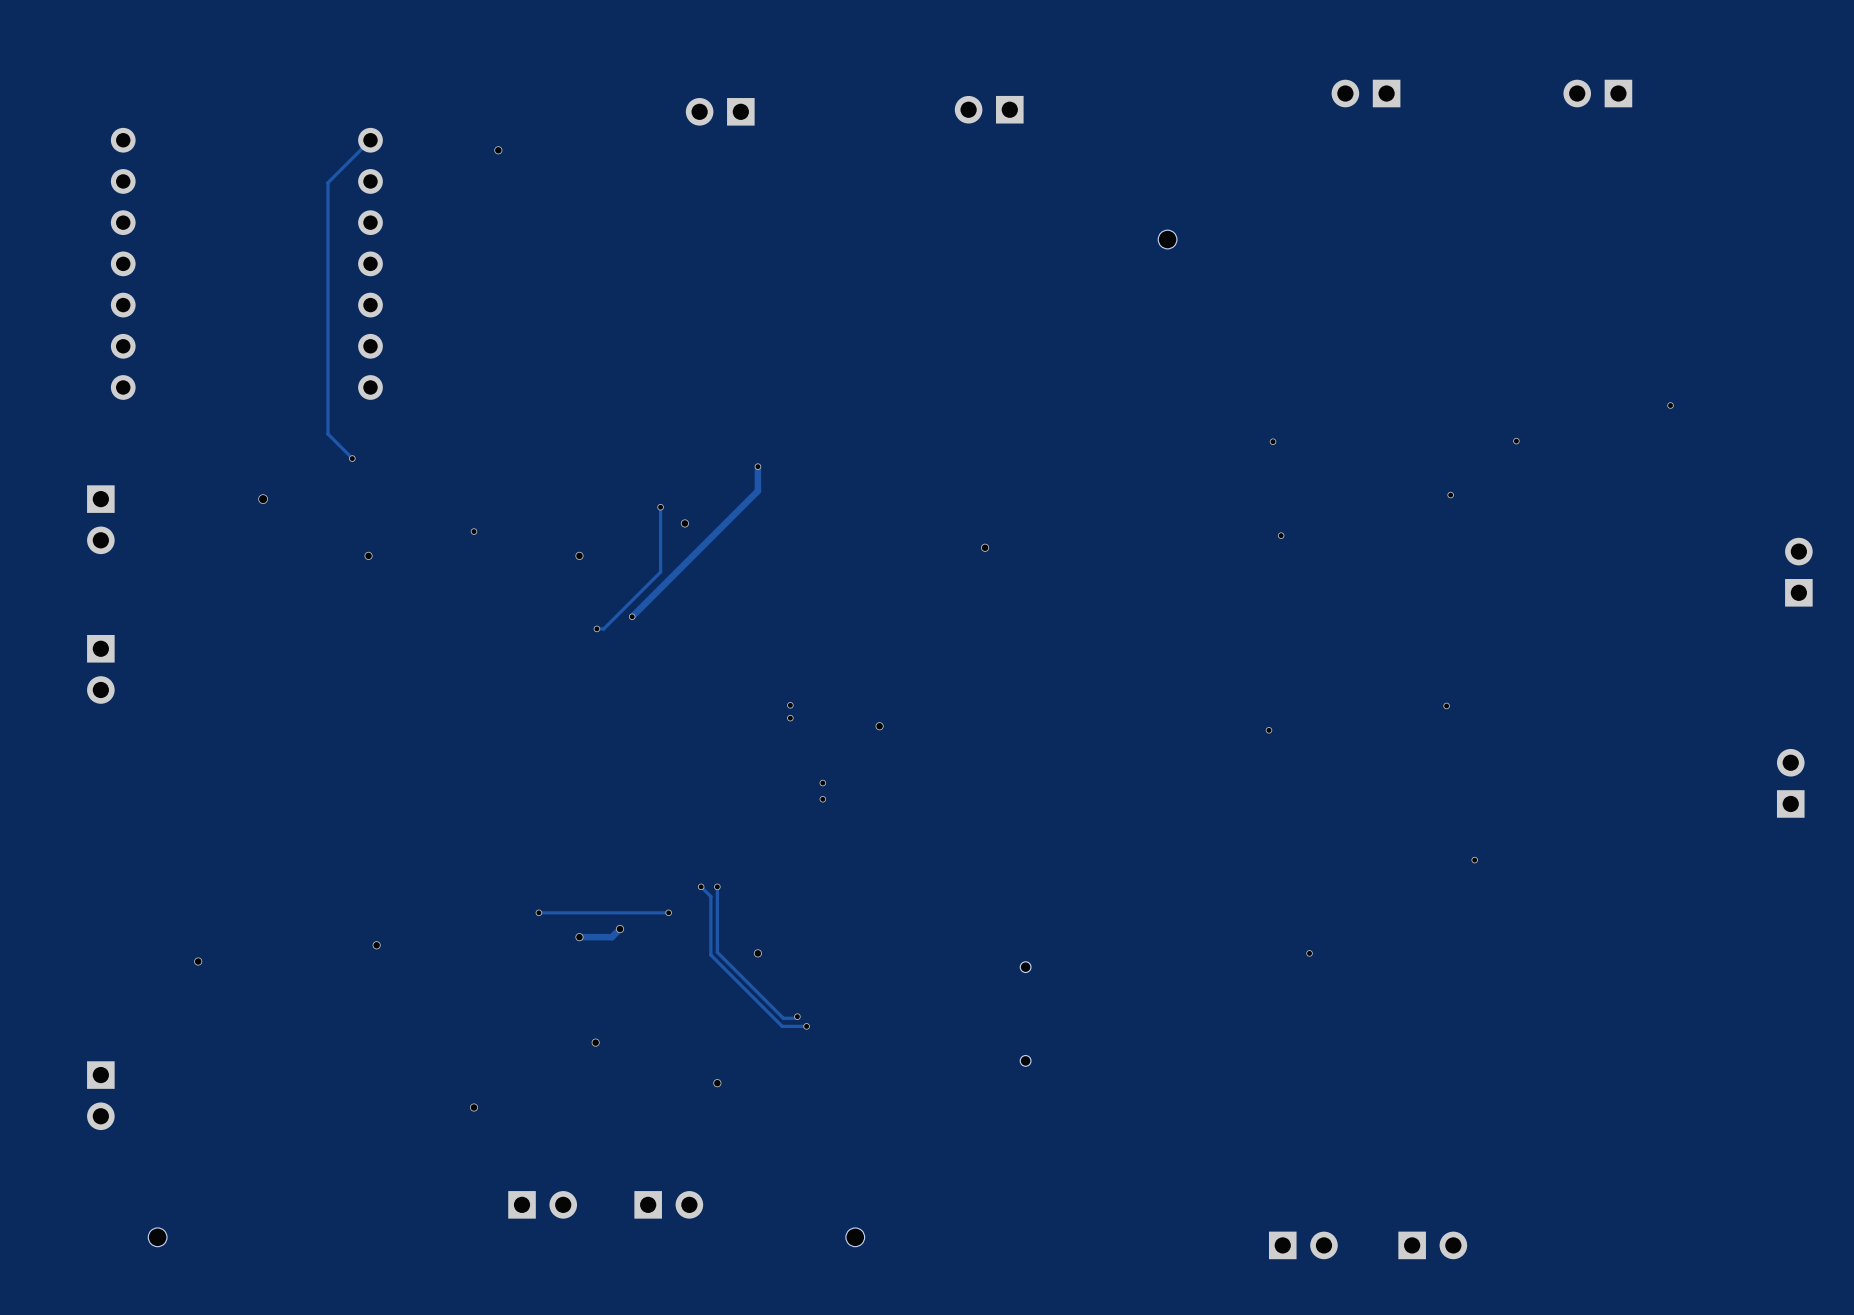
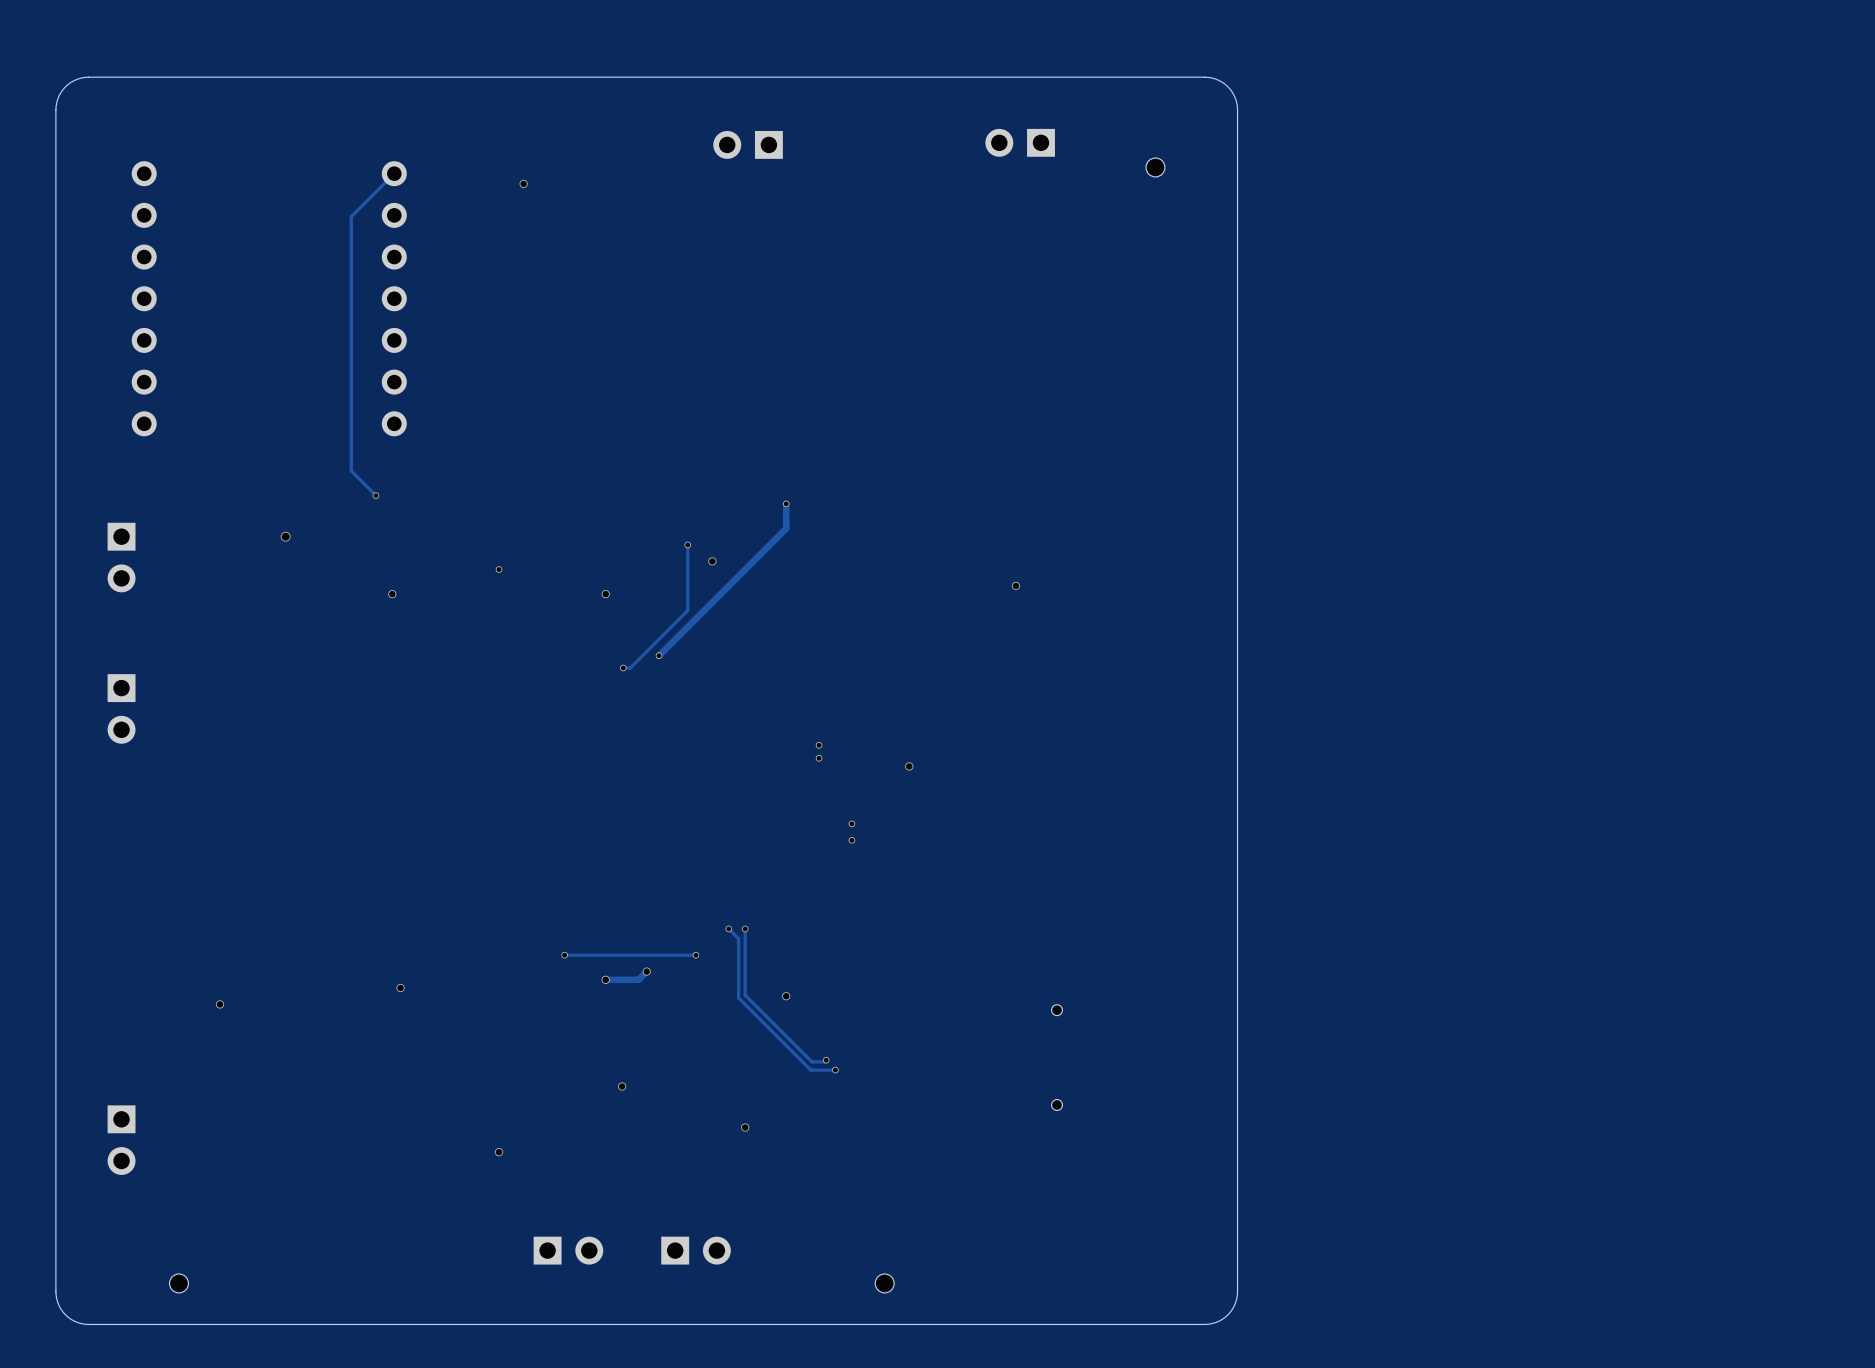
board edge: none -> (1204, 77) (88, 77) (74, 80) (65, 86) (57, 99) (55, 110) (55, 1291) (59, 1305) (65, 1314) (74, 1321) (88, 1324) (1204, 1324) (1215, 1322) (1227, 1314) (1234, 1305) (1237, 1291) (1237, 110) (1234, 95) (1227, 86) (1218, 80) (1204, 77)
part: (1365, 93) -> none
part: (1597, 93) -> none
part position: (1167, 239) -> (1155, 167)
via: (1670, 405) -> none
via: (1273, 441) -> none
via: (1516, 441) -> none
via: (1450, 495) -> none
via: (1281, 535) -> none
part: (1798, 572) -> none
via: (1446, 705) -> none
via: (1268, 730) -> none
part: (1790, 783) -> none
via: (1474, 860) -> none
via: (1309, 953) -> none
part: (1303, 1245) -> none
part: (1432, 1245) -> none

